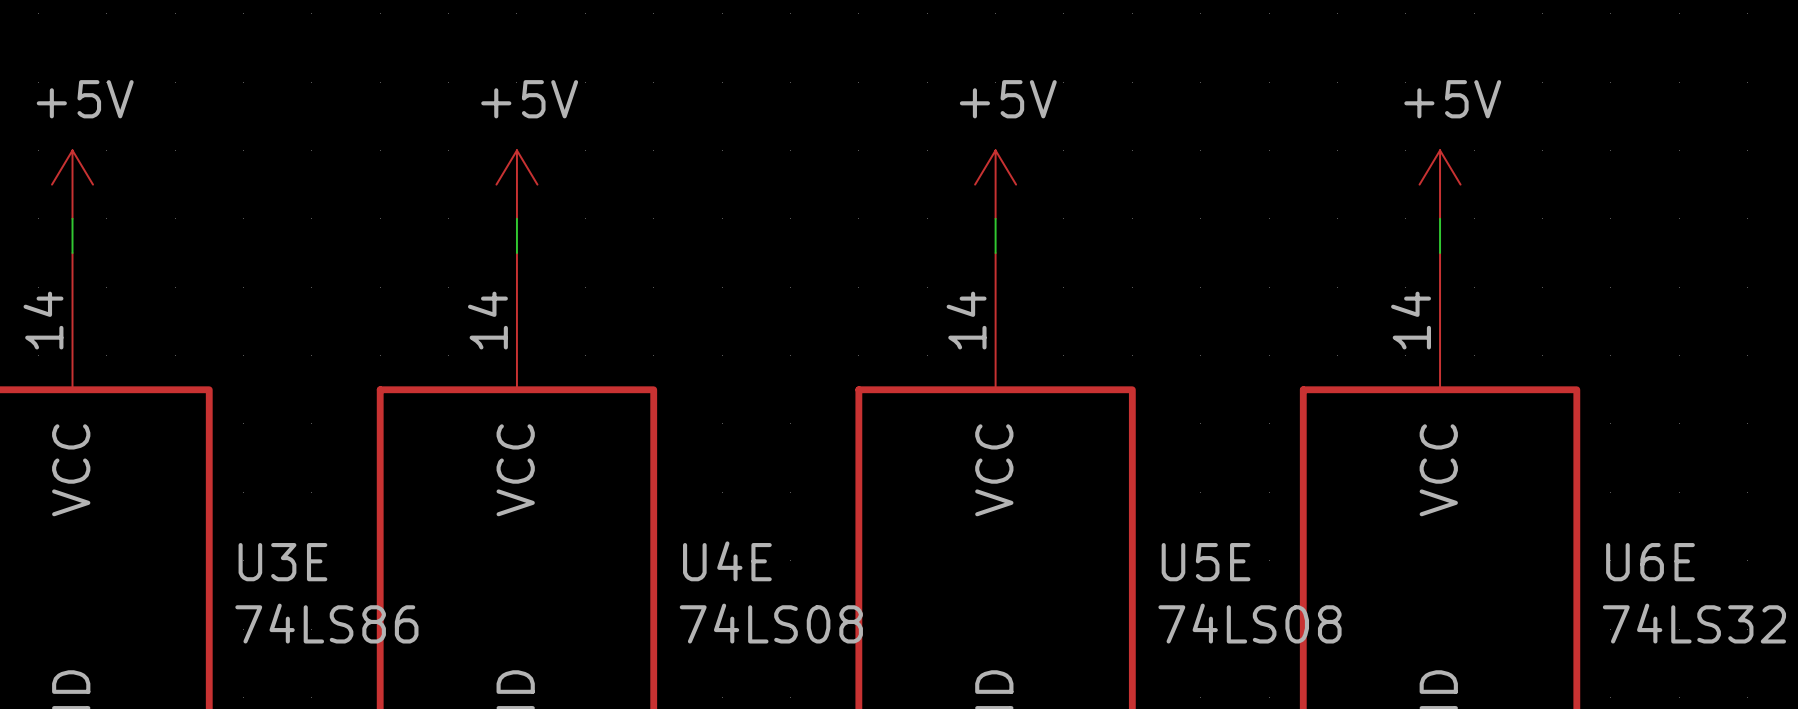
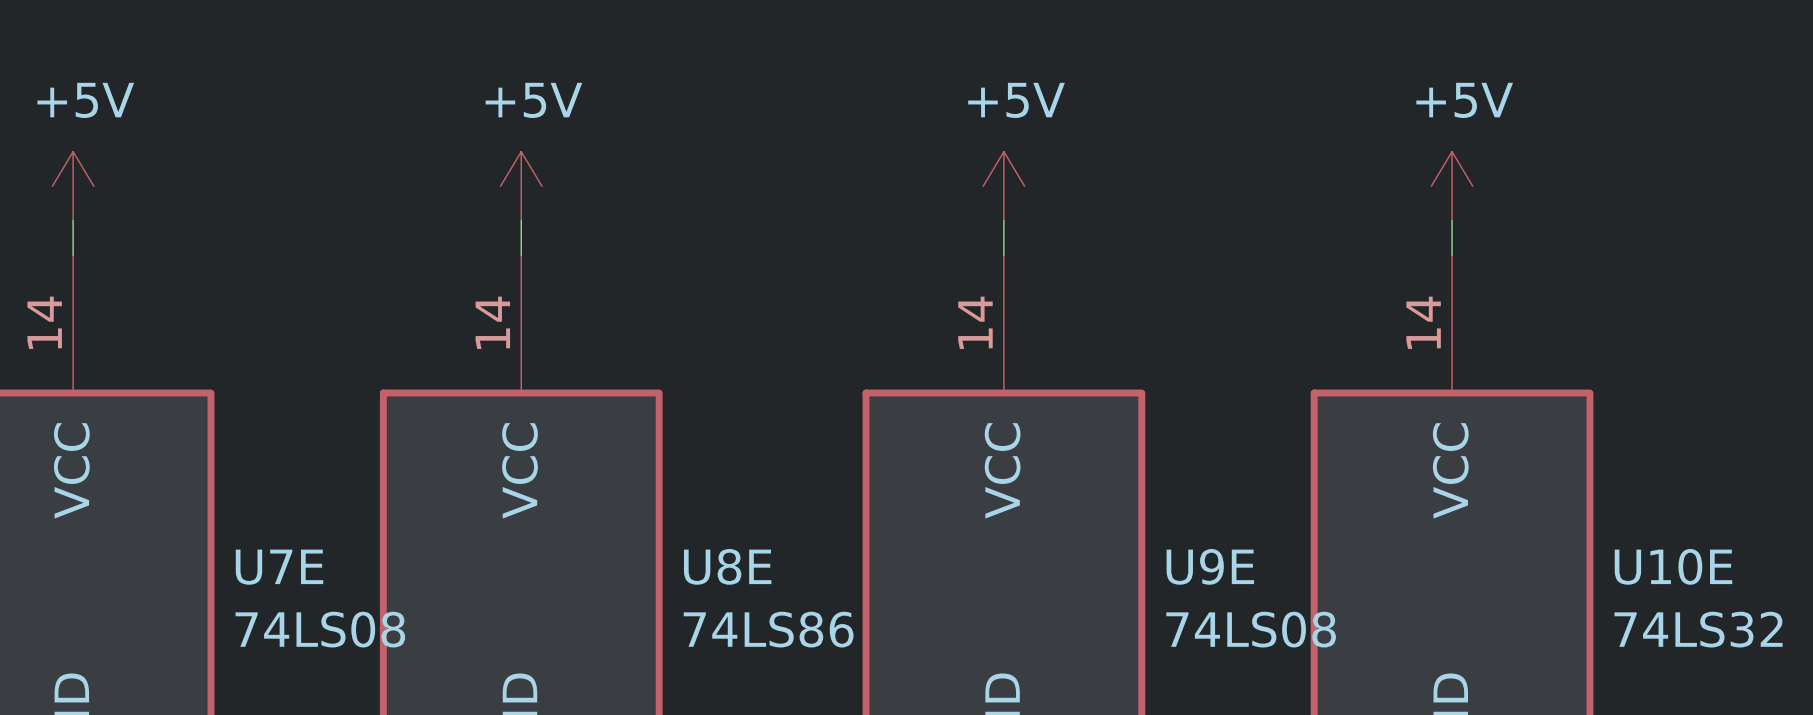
U4E name: U4E (727, 561) -> U8E (727, 566)
U3E name: U3E (282, 562) -> U7E (279, 567)
U5E name: U5E (1206, 562) -> U9E (1210, 566)
U6E name: U6E (1650, 562) -> U10E (1673, 566)
U3E value: 74LS86 (326, 623) -> 74LS08 (320, 629)
U4E value: 74LS08 (771, 623) -> 74LS86 (768, 629)

